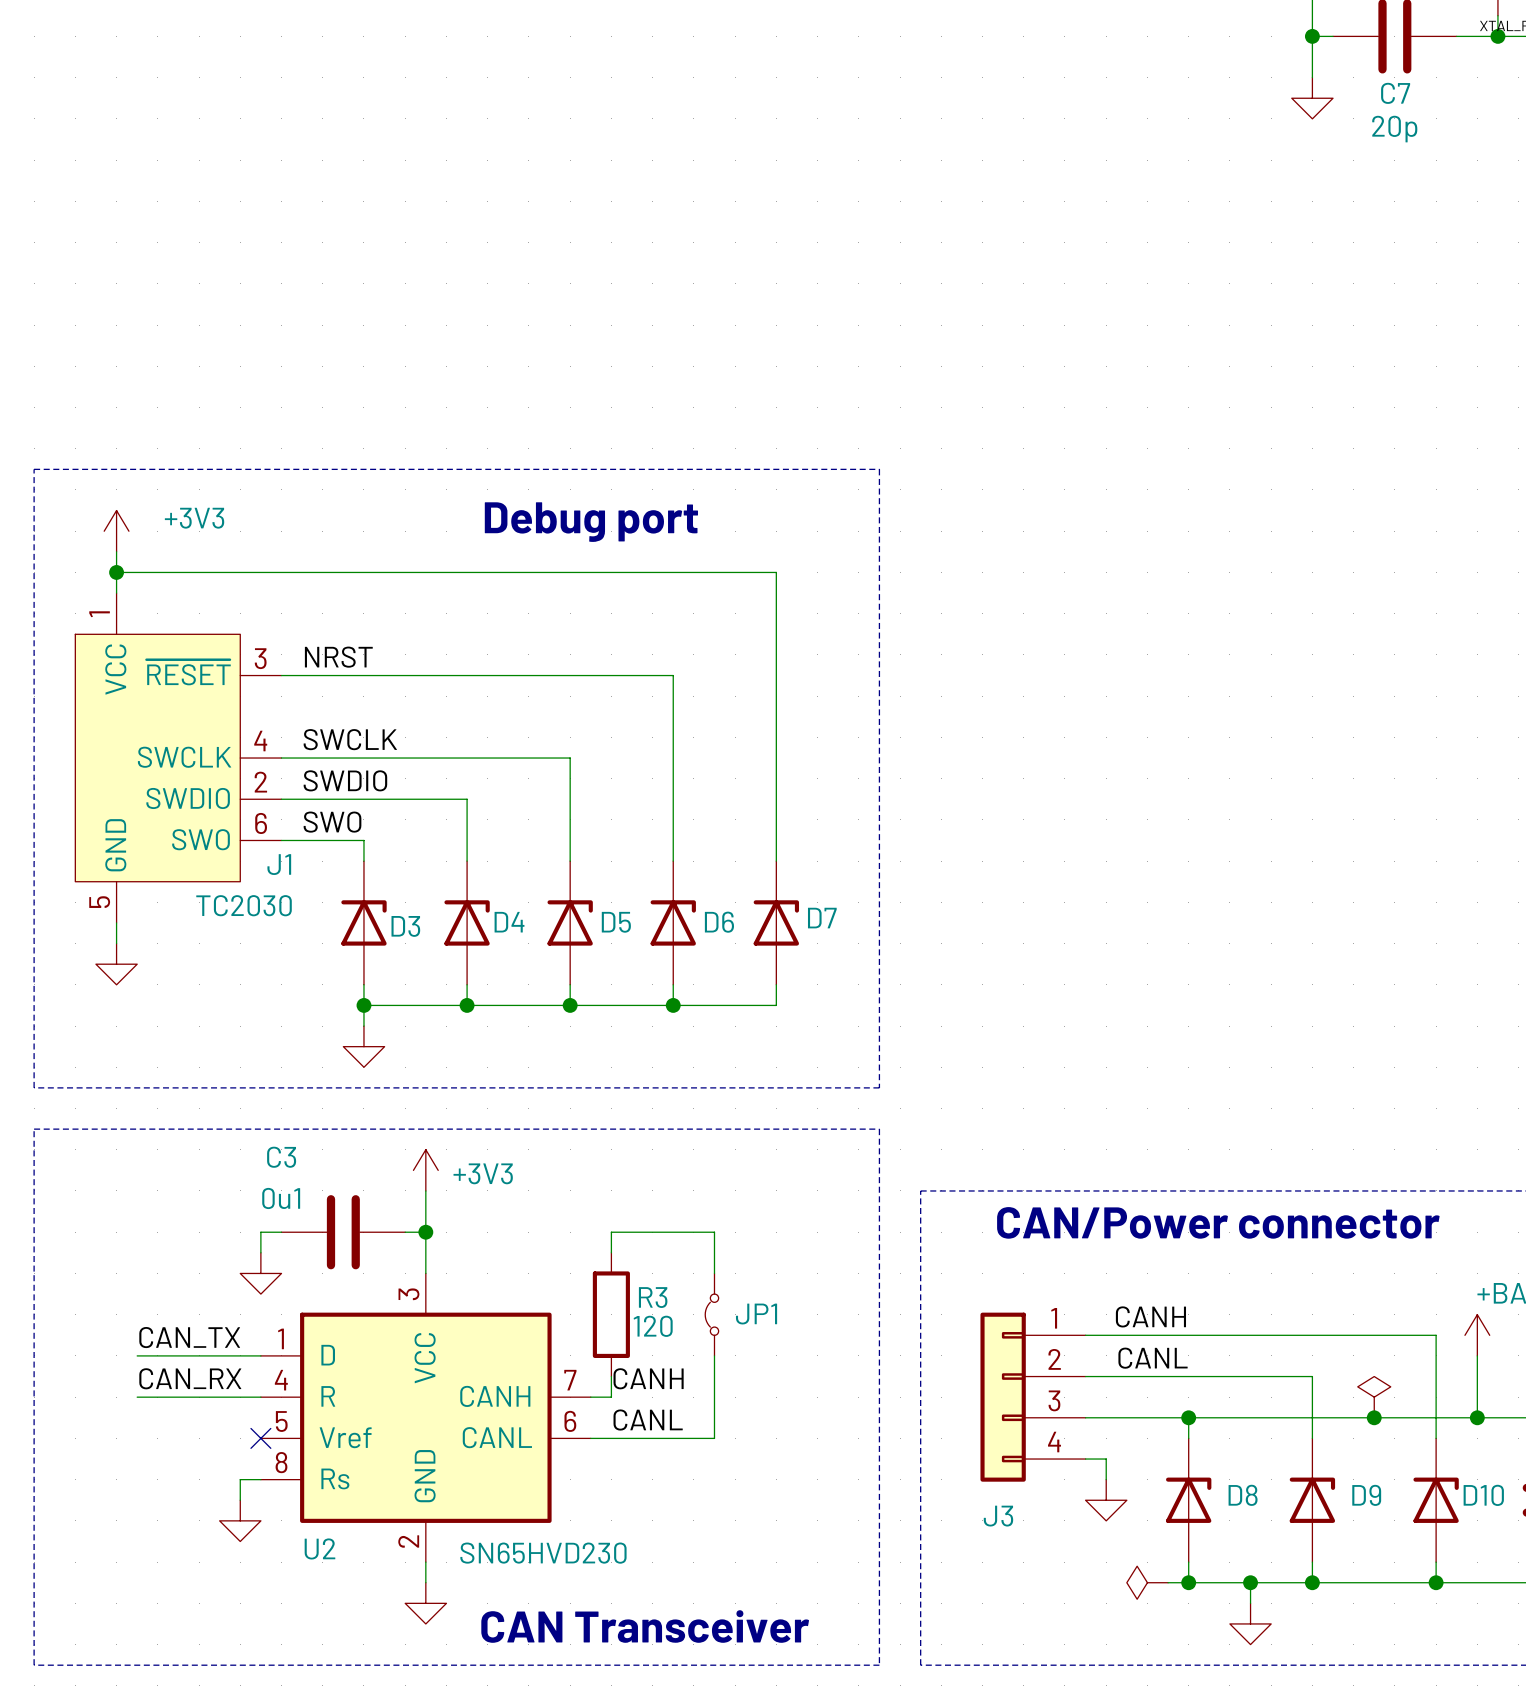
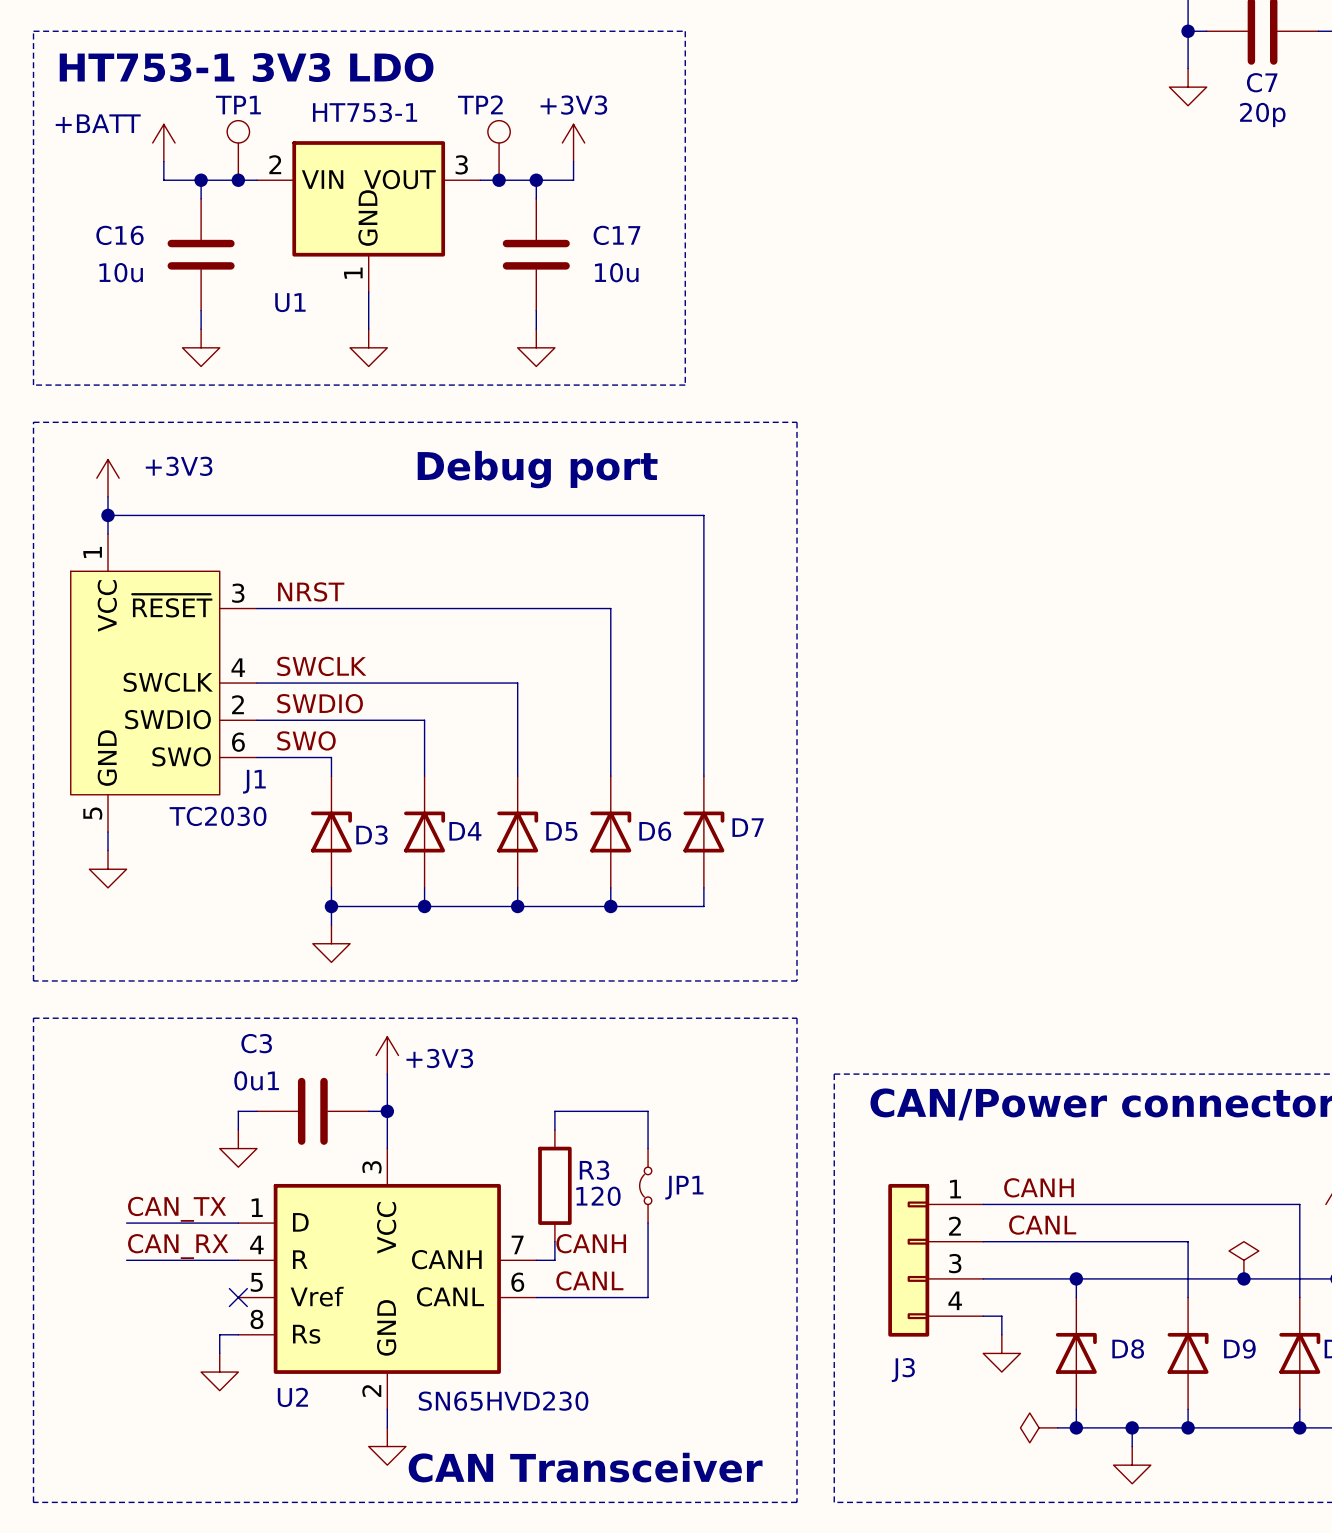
line: none -> (33, 31) (685, 31) (685, 385) (33, 385) (33, 31)
text: none -> HT753-1 3V3 LDO (246, 67)
power symbol: none -> +BATT (163, 142)
power symbol: none -> +3V3 (573, 142)
TP1: none -> (238, 150)
TP2: none -> (499, 150)
wire: none -> (163, 161) (163, 180) (256, 180)
wire: none -> (573, 161) (573, 180) (480, 180)
wire: none -> (201, 180) (201, 198)
junction: none -> (201, 180)
junction: none -> (238, 180)
junction: none -> (499, 180)
wire: none -> (536, 180) (536, 198)
junction: none -> (536, 180)
U1: none -> HT753-1 (368, 216)
C16: none -> 10u (201, 254)
C17: none -> 10u (536, 254)
wire: none -> (368, 291) (368, 329)
wire: none -> (201, 310) (201, 329)
wire: none -> (536, 310) (536, 329)
power symbol: none -> (201, 347)
power symbol: none -> (368, 347)
power symbol: none -> (536, 347)

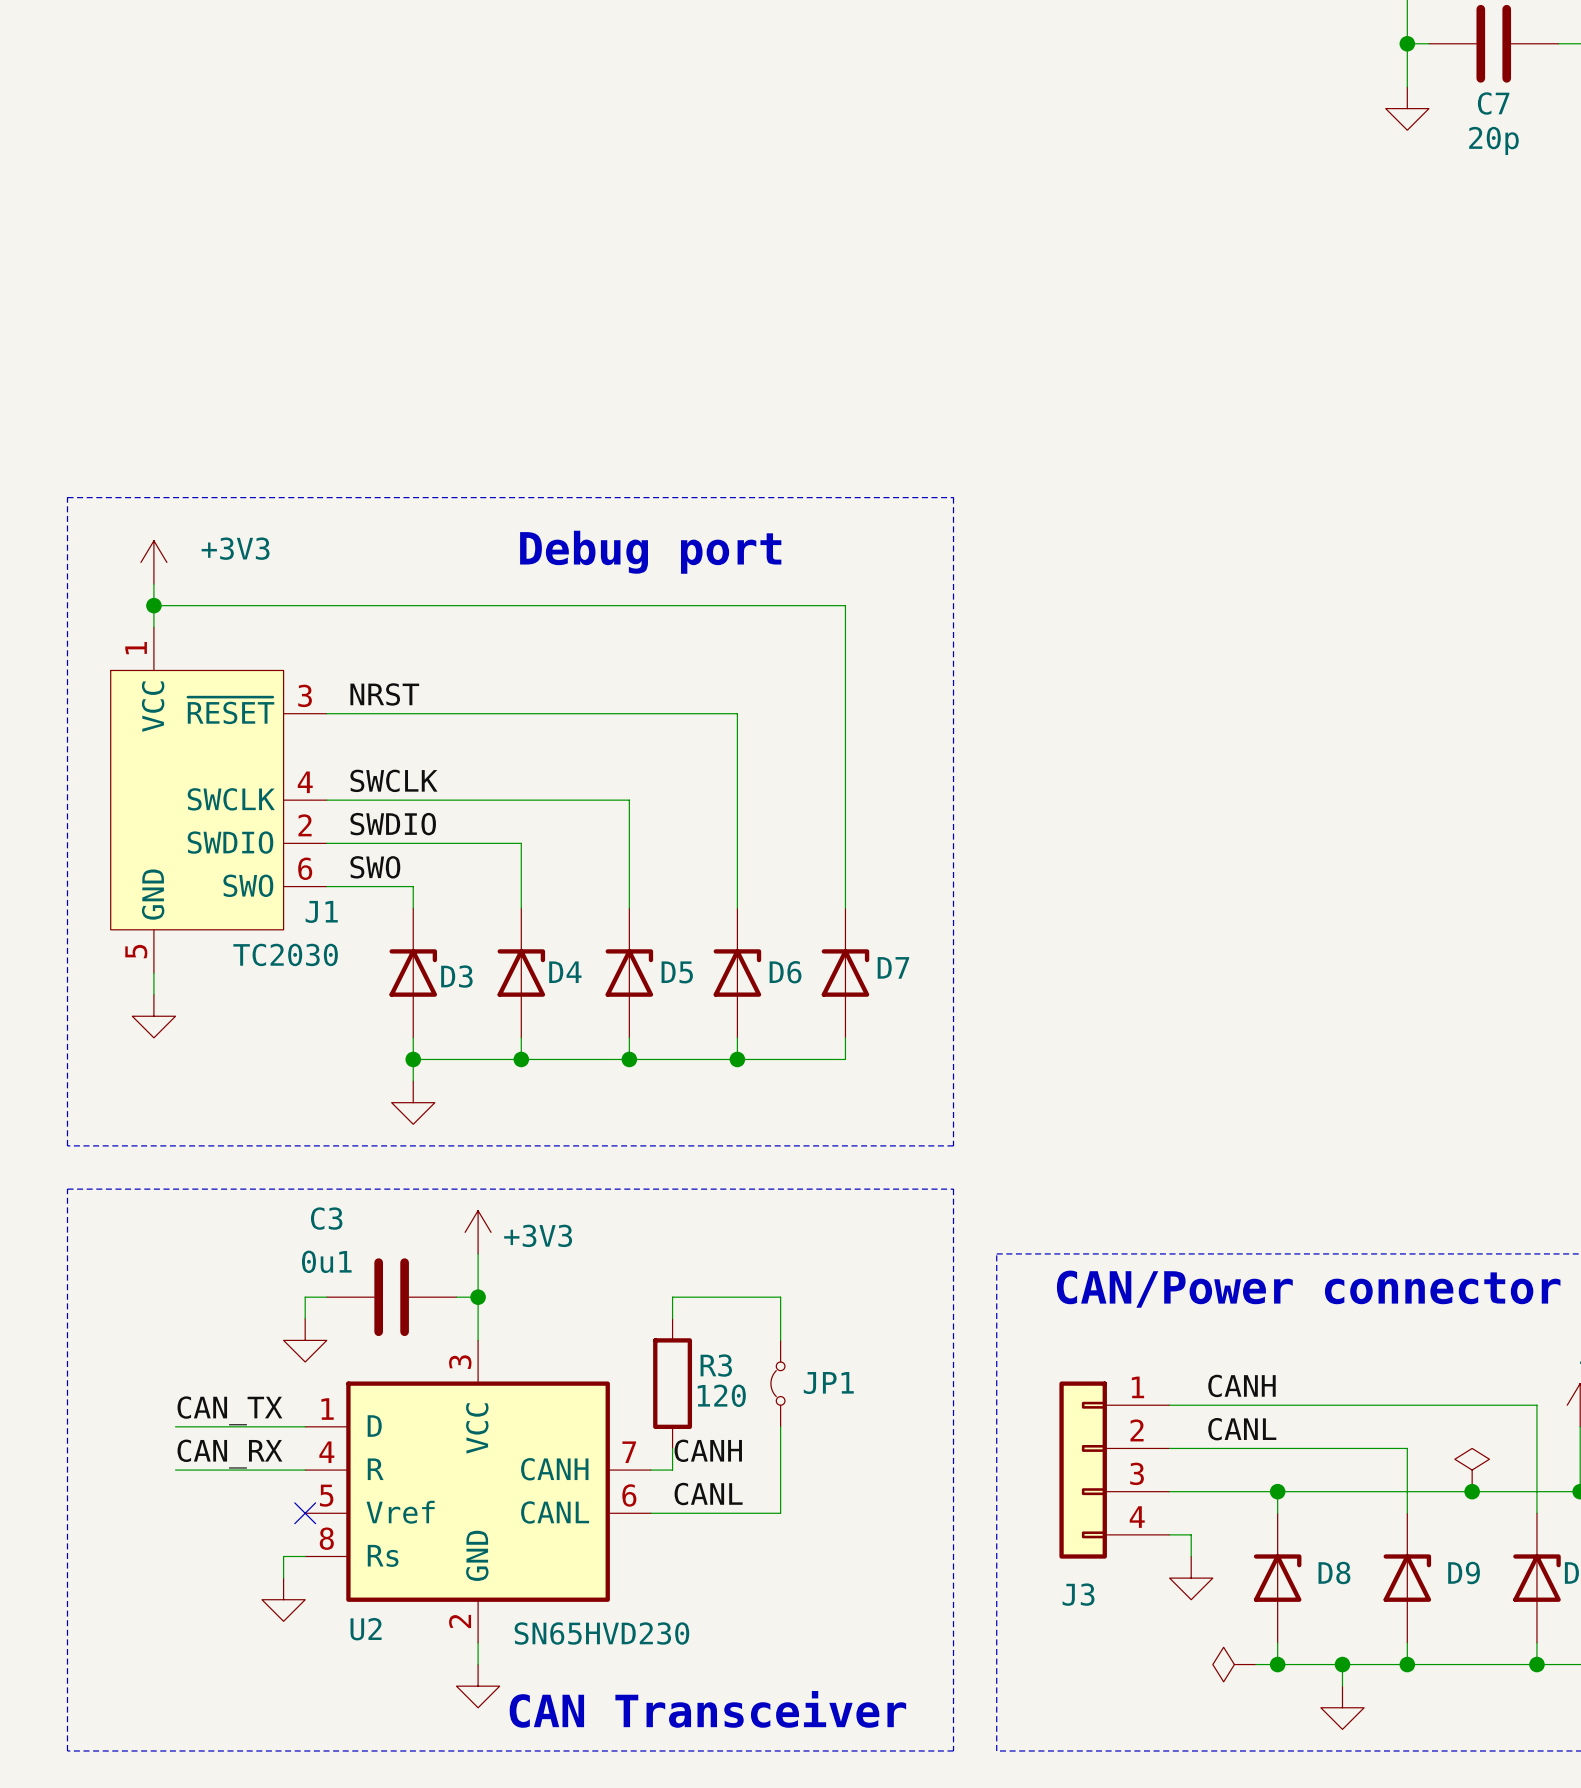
line: (33, 31) (685, 31) (685, 385) (33, 385) (33, 31) -> none
text: HT753-1 3V3 LDO (246, 67) -> none
power symbol: +BATT (163, 142) -> none
power symbol: +3V3 (573, 142) -> none
TP1: (238, 150) -> none
TP2: (499, 150) -> none
wire: (163, 161) (163, 180) (256, 180) -> none
wire: (573, 161) (573, 180) (480, 180) -> none
wire: (201, 180) (201, 198) -> none
junction: (201, 180) -> none
junction: (238, 180) -> none
junction: (499, 180) -> none
wire: (536, 180) (536, 198) -> none
junction: (536, 180) -> none
U1: HT753-1 (368, 216) -> none
C16: 10u (201, 254) -> none
C17: 10u (536, 254) -> none
wire: (368, 291) (368, 329) -> none
wire: (201, 310) (201, 329) -> none
wire: (536, 310) (536, 329) -> none
power symbol: (201, 347) -> none
power symbol: (368, 347) -> none
power symbol: (536, 347) -> none

